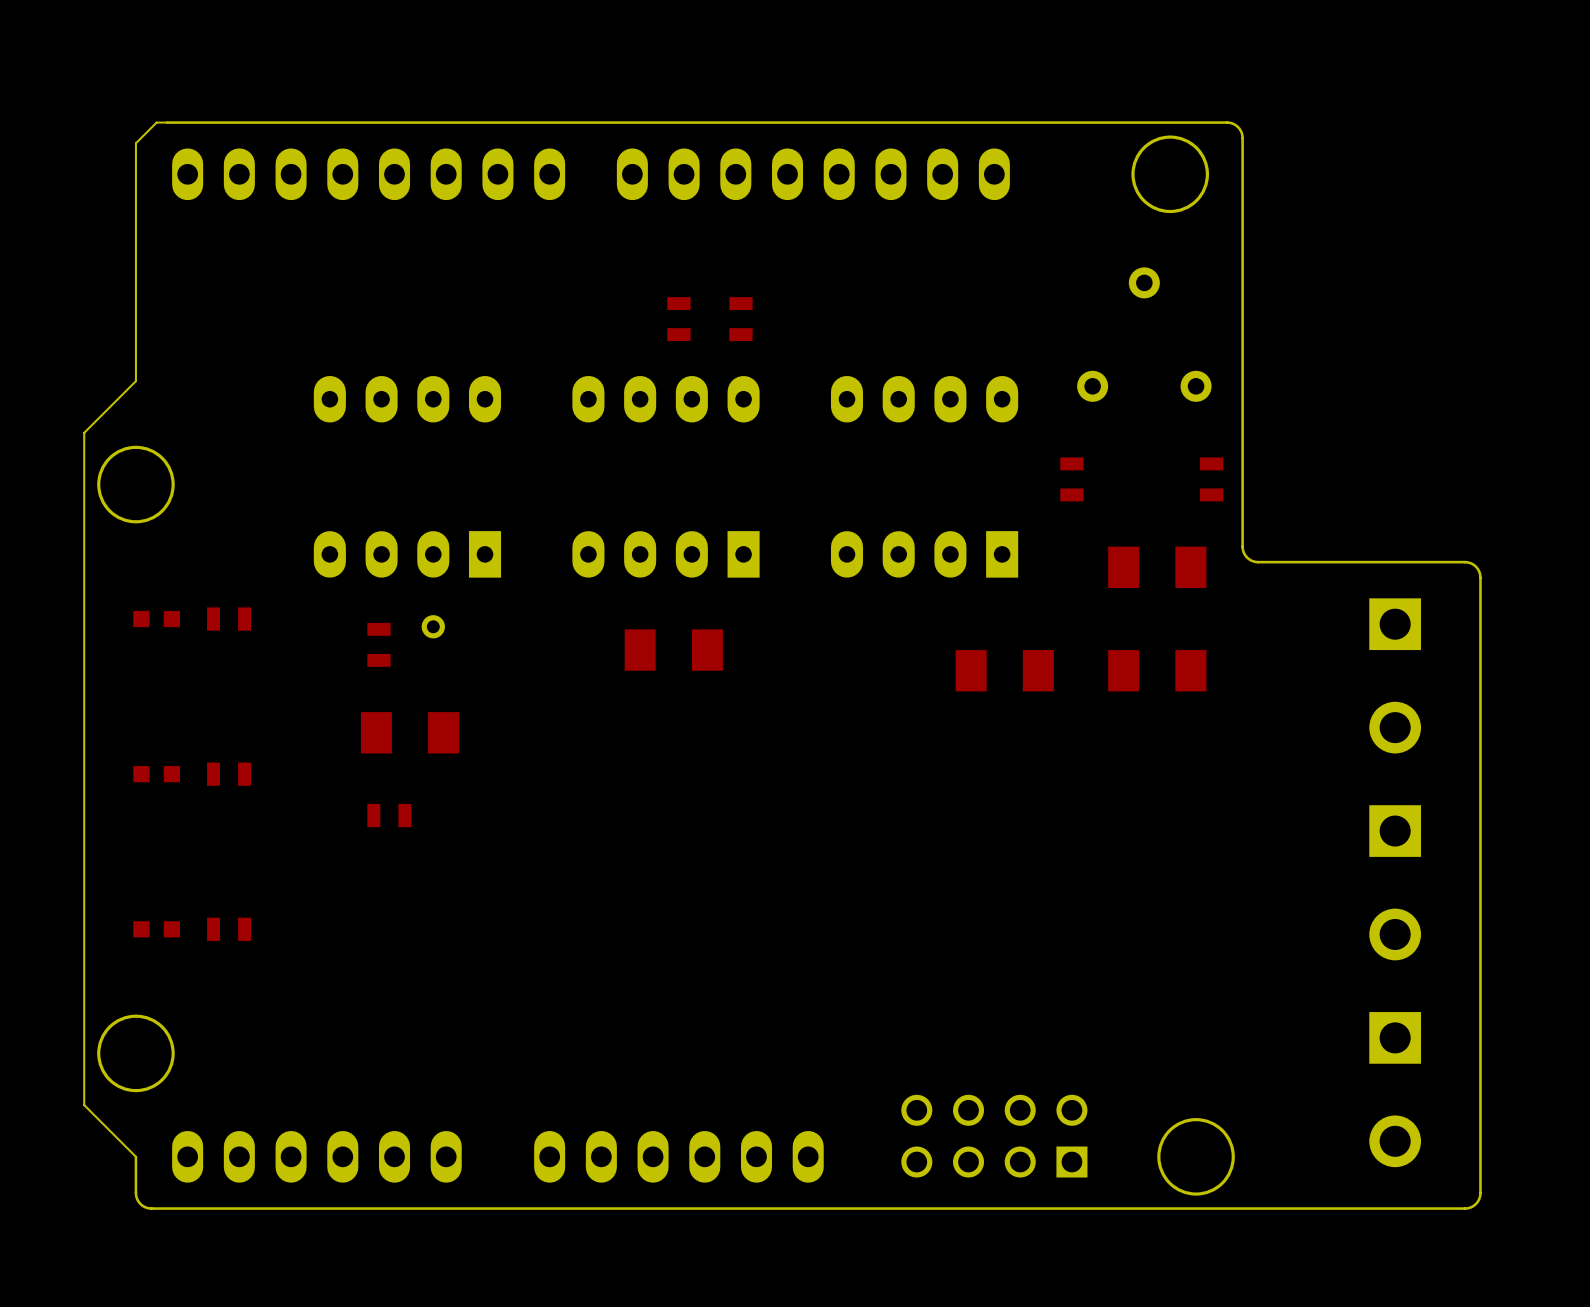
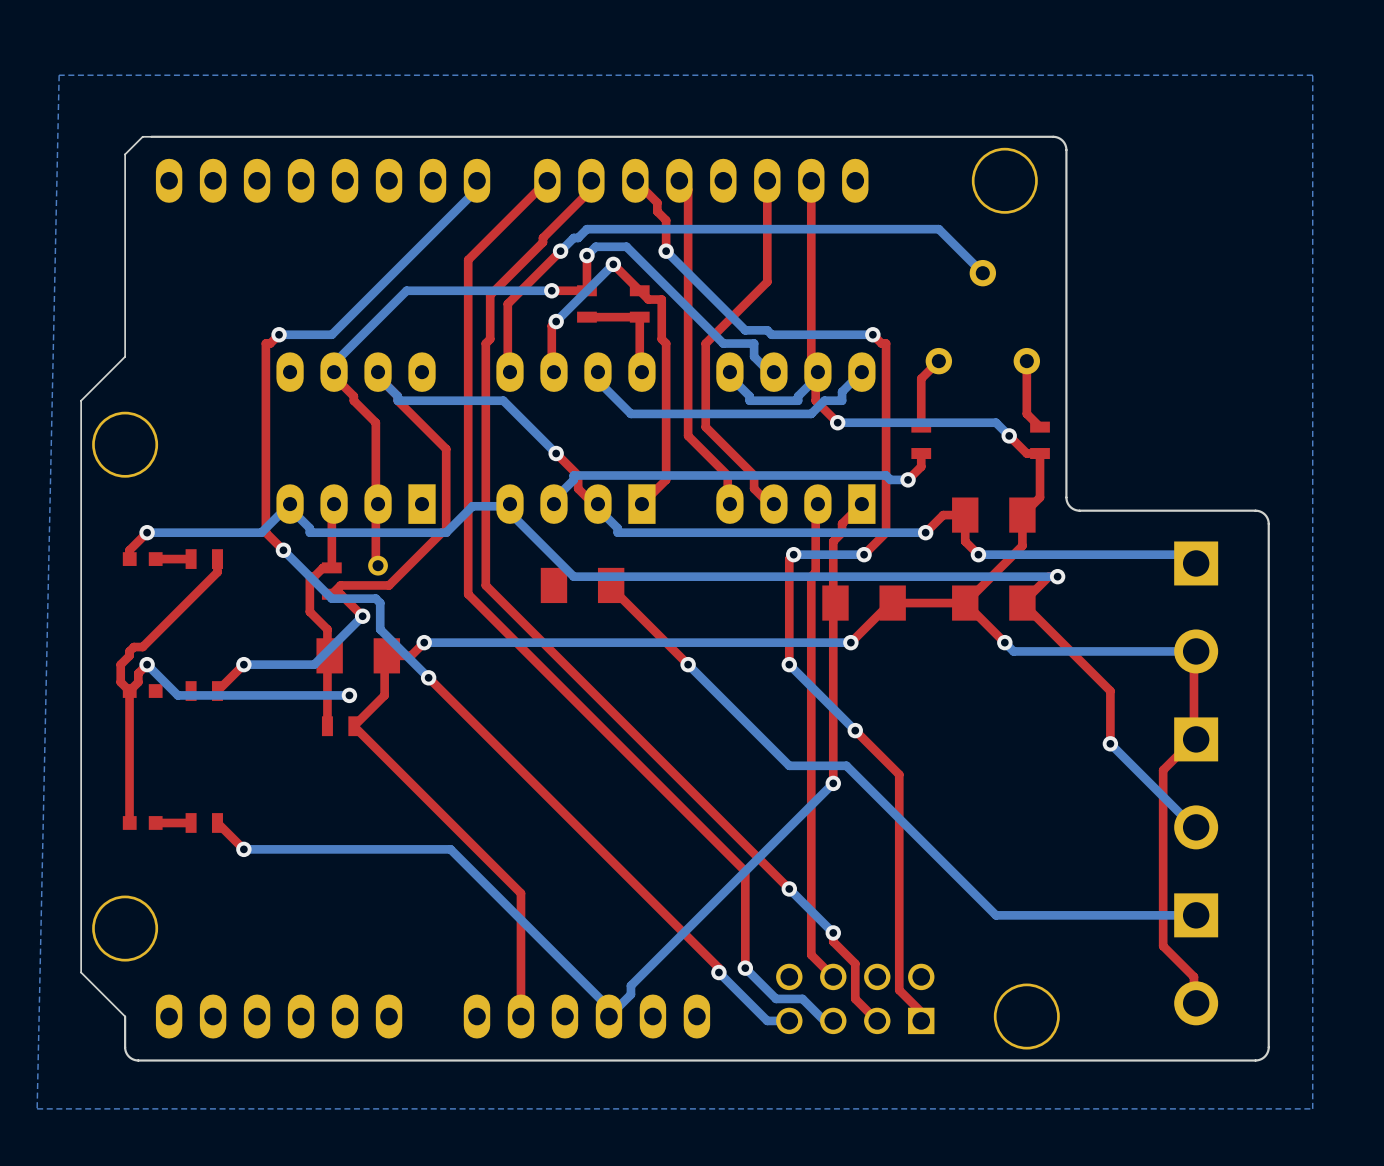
bottom zone outline: none -> (1312, 75) (1312, 1108) (37, 1108) (59, 75) (1312, 75)
bottom track: none -> (477, 180) (477, 189) (331, 334) (279, 334)
top track: none -> (547, 180) (468, 259) (468, 594) (745, 871) (745, 968)
top track: none -> (591, 180) (591, 189) (542, 237) (542, 242) (490, 295) (490, 339) (485, 343) (485, 585) (789, 888)
top track: none -> (635, 180) (657, 202) (657, 211) (666, 220) (666, 251)
top track: none -> (679, 180) (688, 189) (688, 435) (727, 475) (727, 506) (729, 504)
top track: none -> (767, 180) (767, 281) (705, 343) (705, 427) (754, 475) (754, 488) (767, 501) (773, 504)
top track: none -> (811, 180) (811, 369) (817, 372) (815, 374) (815, 400) (837, 422)
top track: none -> (560, 251) (507, 303) (507, 374) (509, 372)
bottom track: none -> (560, 251) (573, 237) (578, 237) (586, 229) (938, 229) (982, 273)
via: none -> (560, 251)
bottom track: none -> (666, 251) (745, 330) (767, 330) (771, 334) (872, 334)
via: none -> (666, 251)
top track: none -> (586, 255) (586, 290) (551, 290)
bottom track: none -> (586, 255) (595, 246) (626, 246) (723, 343) (754, 343) (754, 356) (771, 374) (773, 372)
via: none -> (586, 255)
top track: none -> (613, 264) (648, 299) (661, 299) (661, 339) (666, 343) (666, 479) (641, 504)
bottom track: none -> (613, 264) (556, 321)
via: none -> (613, 264)
bottom track: none -> (551, 290) (406, 290) (331, 365) (331, 374) (334, 372)
via: none -> (551, 290)
top track: none -> (586, 317) (639, 317) (639, 374) (641, 372)
top track: none -> (556, 321) (551, 325) (551, 374) (553, 372)
via: none -> (556, 321)
top track: none -> (279, 334) (270, 343) (265, 343) (265, 532) (283, 550)
via: none -> (279, 334)
top track: none -> (872, 334) (881, 343) (886, 343) (886, 532) (864, 554)
via: none -> (872, 334)
top track: none -> (938, 361) (921, 378) (921, 427)
top track: none -> (1026, 361) (1026, 413) (1040, 427)
top track: none -> (334, 372) (336, 378) (353, 396) (353, 400) (375, 422) (375, 567) (378, 565)
top track: none -> (378, 372) (380, 378) (397, 396) (397, 400) (446, 449) (446, 532) (441, 532) (389, 585) (340, 585) (331, 594) (340, 594) (362, 616)
bottom track: none -> (378, 372) (375, 374) (397, 396) (397, 400) (503, 400) (556, 453)
bottom track: none -> (817, 372) (815, 378) (798, 396) (798, 400) (749, 400) (749, 396) (727, 374) (729, 372)
bottom track: none -> (861, 372) (842, 391) (842, 400) (824, 400) (811, 413) (630, 413) (595, 378) (597, 372)
bottom track: none -> (837, 422) (996, 422) (1009, 435)
via: none -> (837, 422)
top track: none -> (1009, 435) (1026, 453) (1040, 453) (1040, 497) (1022, 515) (1022, 545) (965, 603)
via: none -> (1009, 435)
top track: none -> (556, 453) (578, 475) (578, 488) (591, 501) (597, 504)
via: none -> (556, 453)
top track: none -> (921, 453) (921, 466) (908, 479)
bottom track: none -> (908, 479) (890, 479) (886, 475) (573, 475) (573, 479) (551, 501) (551, 506) (553, 504)
via: none -> (908, 479)
top track: none -> (334, 504) (331, 506) (331, 567) (323, 567) (314, 576) (309, 576) (309, 611) (327, 629) (327, 726)
bottom track: none -> (597, 504) (595, 506) (617, 528) (617, 532) (925, 532)
top track: none -> (817, 504) (815, 506) (815, 572) (811, 576) (811, 954) (833, 976)
top track: none -> (861, 504) (842, 523) (842, 532) (833, 541) (833, 783)
bottom track: none -> (507, 506) (507, 510) (573, 576) (1057, 576)
bottom track: none -> (507, 506) (472, 506) (446, 532) (309, 532) (309, 528) (292, 510) (290, 504) (261, 532) (147, 532)
top track: none -> (147, 532) (129, 550) (129, 559)
via: none -> (147, 532)
top track: none -> (925, 532) (943, 515) (965, 515) (965, 541) (978, 554)
via: none -> (925, 532)
bottom track: none -> (283, 550) (331, 598) (375, 598) (380, 603) (380, 629) (428, 677)
via: none -> (283, 550)
top track: none -> (793, 554) (789, 559) (789, 664)
via: none -> (793, 554)
bottom track: none -> (864, 554) (793, 554)
via: none -> (864, 554)
bottom track: none -> (978, 554) (1185, 554) (1196, 563)
via: none -> (978, 554)
top track: none -> (191, 559) (155, 559)
top track: none -> (217, 559) (217, 572) (142, 647) (133, 647) (129, 651) (129, 655) (120, 664) (120, 682) (129, 691)
top track: none -> (1057, 576) (1048, 576) (1022, 603) (1110, 691) (1110, 743)
via: none -> (1057, 576)
top track: none -> (611, 585) (608, 585) (688, 664)
top track: none -> (965, 603) (890, 603) (850, 642)
top track: none -> (965, 603) (1004, 642)
bottom track: none -> (362, 616) (314, 664) (243, 664)
via: none -> (362, 616)
top track: none -> (424, 642) (411, 655) (384, 655) (384, 695) (353, 726) (520, 893) (520, 1016)
via: none -> (424, 642)
bottom track: none -> (850, 642) (424, 642)
via: none -> (850, 642)
bottom track: none -> (1004, 642) (1013, 651) (1196, 651)
via: none -> (1004, 642)
top track: none -> (1196, 651) (1193, 651) (1193, 739)
top track: none -> (147, 664) (138, 673) (138, 682) (129, 691)
bottom track: none -> (147, 664) (177, 695) (349, 695)
via: none -> (147, 664)
top track: none -> (243, 664) (217, 691)
via: none -> (243, 664)
bottom track: none -> (688, 664) (789, 765) (846, 765) (996, 915) (1196, 915)
via: none -> (688, 664)
bottom track: none -> (789, 664) (855, 730)
via: none -> (789, 664)
top track: none -> (428, 677) (718, 968) (718, 972)
via: none -> (428, 677)
top track: none -> (129, 691) (129, 822)
via: none -> (349, 695)
top track: none -> (855, 730) (899, 774) (899, 990) (921, 1012) (921, 1020)
via: none -> (855, 730)
top track: none -> (1193, 739) (1163, 770) (1163, 946) (1193, 976) (1193, 1003) (1196, 1003)
bottom track: none -> (1110, 743) (1193, 827) (1196, 827)
via: none -> (1110, 743)
bottom track: none -> (833, 783) (630, 985) (630, 994) (608, 1016) (608, 1007) (450, 849) (243, 849)
via: none -> (833, 783)
top track: none -> (191, 822) (155, 822)
top track: none -> (217, 822) (243, 849)
via: none -> (243, 849)
bottom track: none -> (789, 888) (833, 932)
via: none -> (789, 888)
top track: none -> (833, 932) (833, 941) (855, 963) (855, 998) (877, 1020)
via: none -> (833, 932)
bottom track: none -> (745, 968) (776, 998) (802, 998) (824, 1020) (833, 1020)
via: none -> (745, 968)
bottom track: none -> (718, 972) (767, 1020) (789, 1020)
via: none -> (718, 972)

